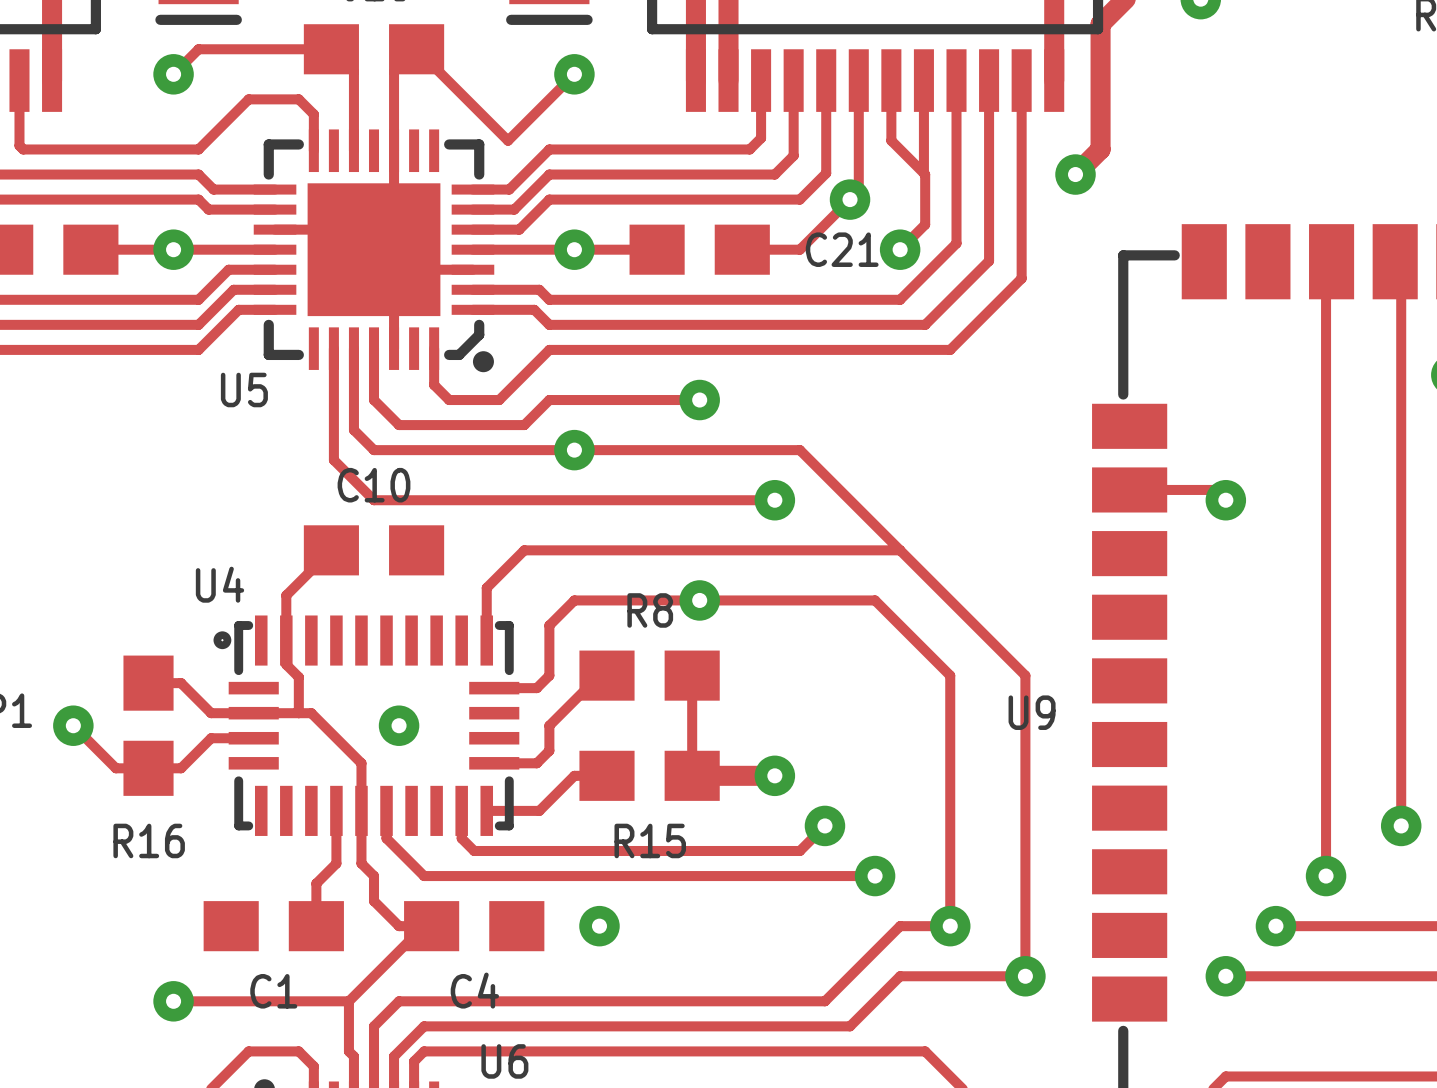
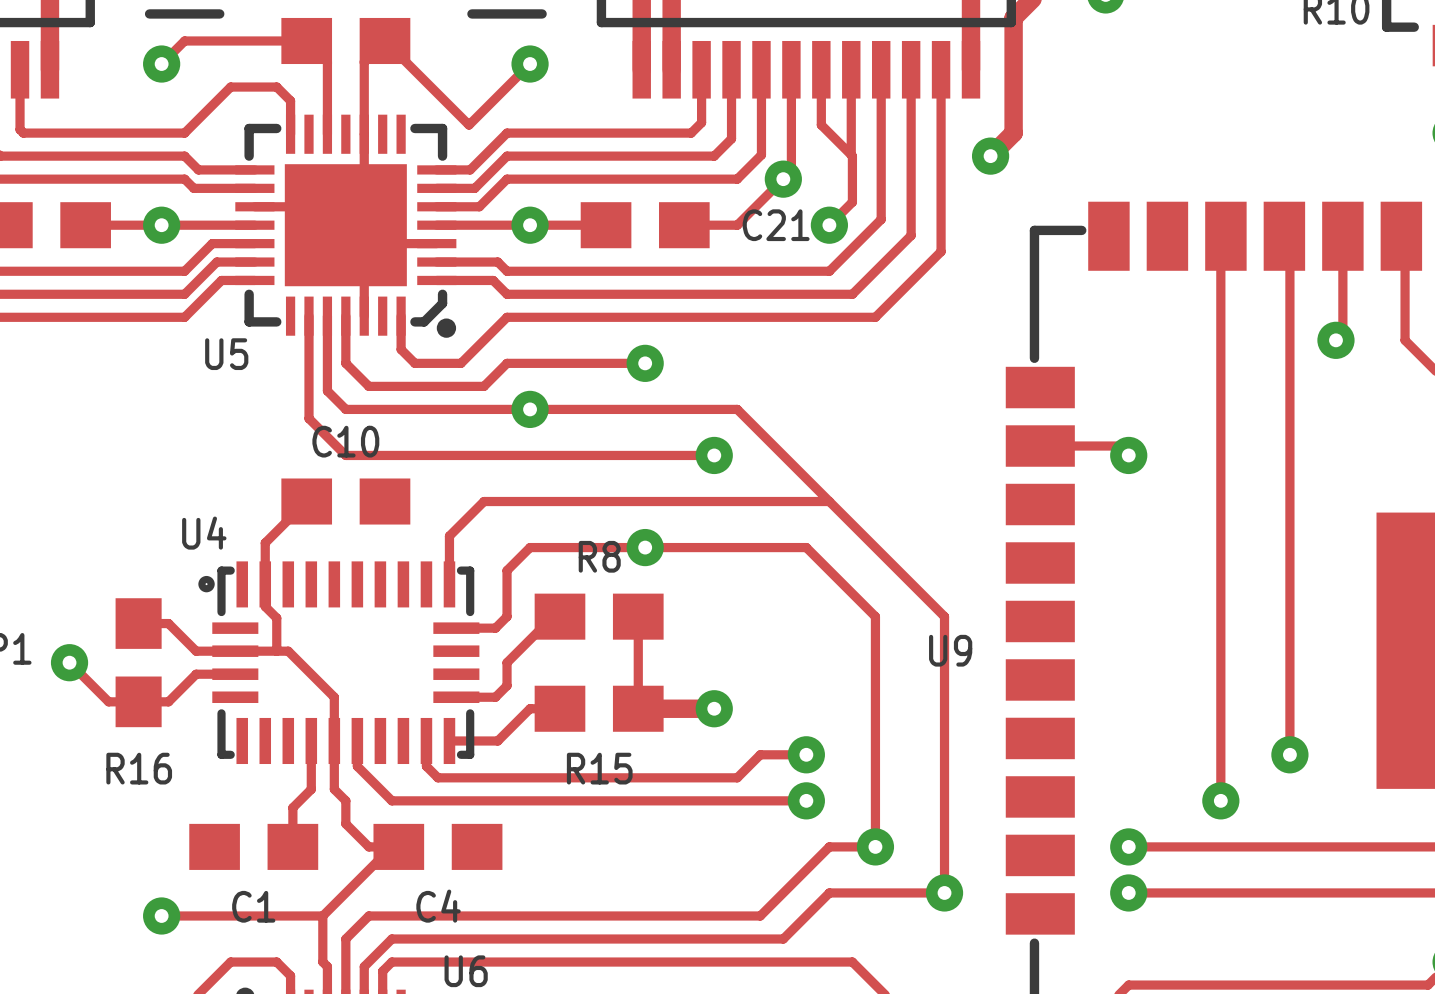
via: (399, 725) -> none
track: none -> (760, 754) (806, 754)
via position: (824, 825) -> (806, 754)
via: (599, 926) -> none
track: none -> (1128, 846) (1174, 846)
via position: (1275, 926) -> (1128, 846)

